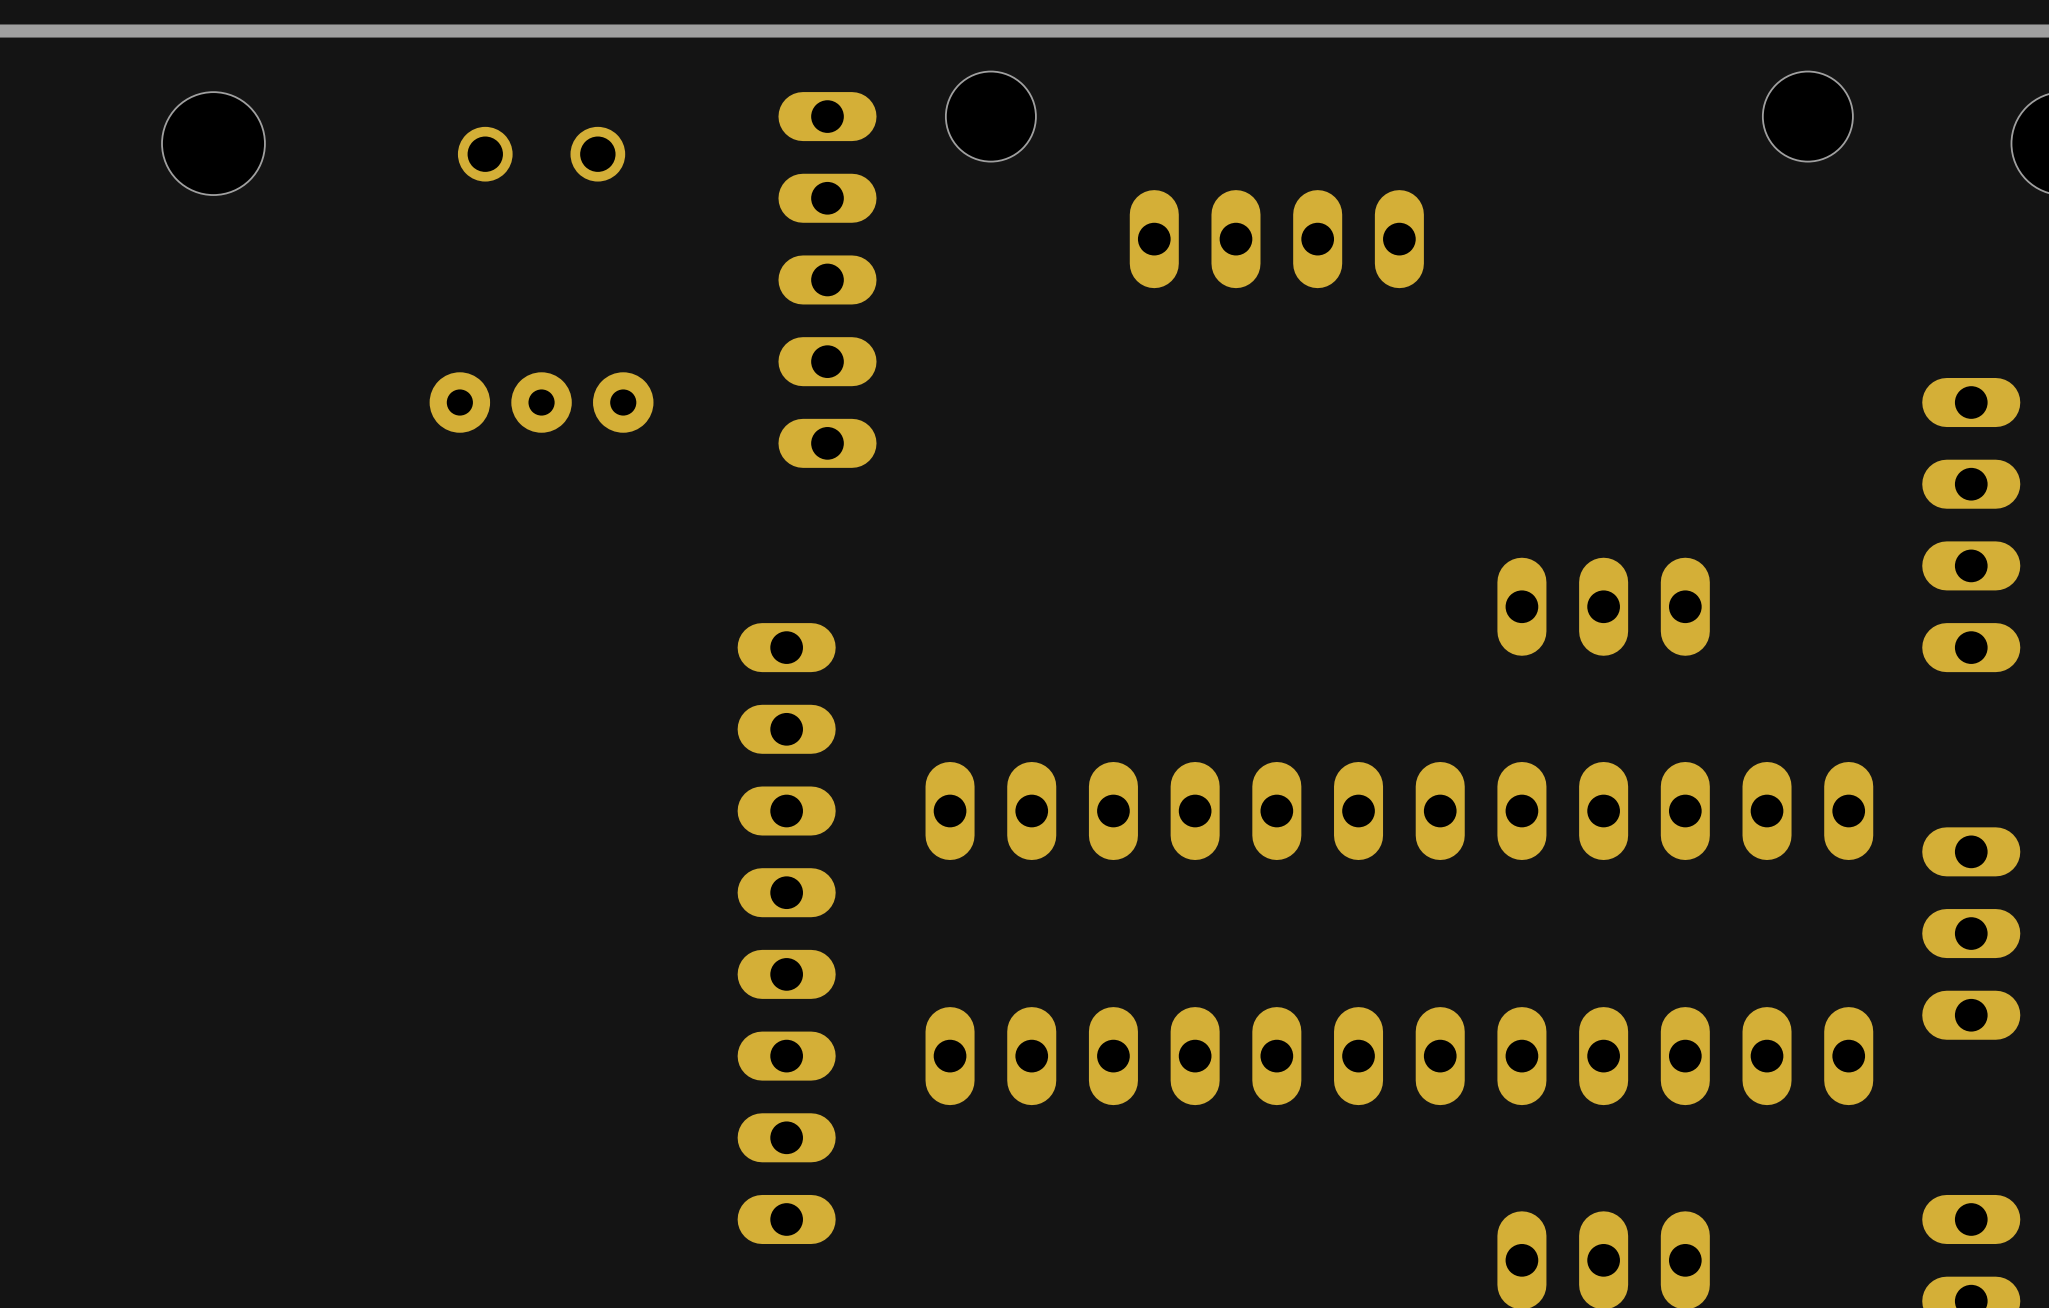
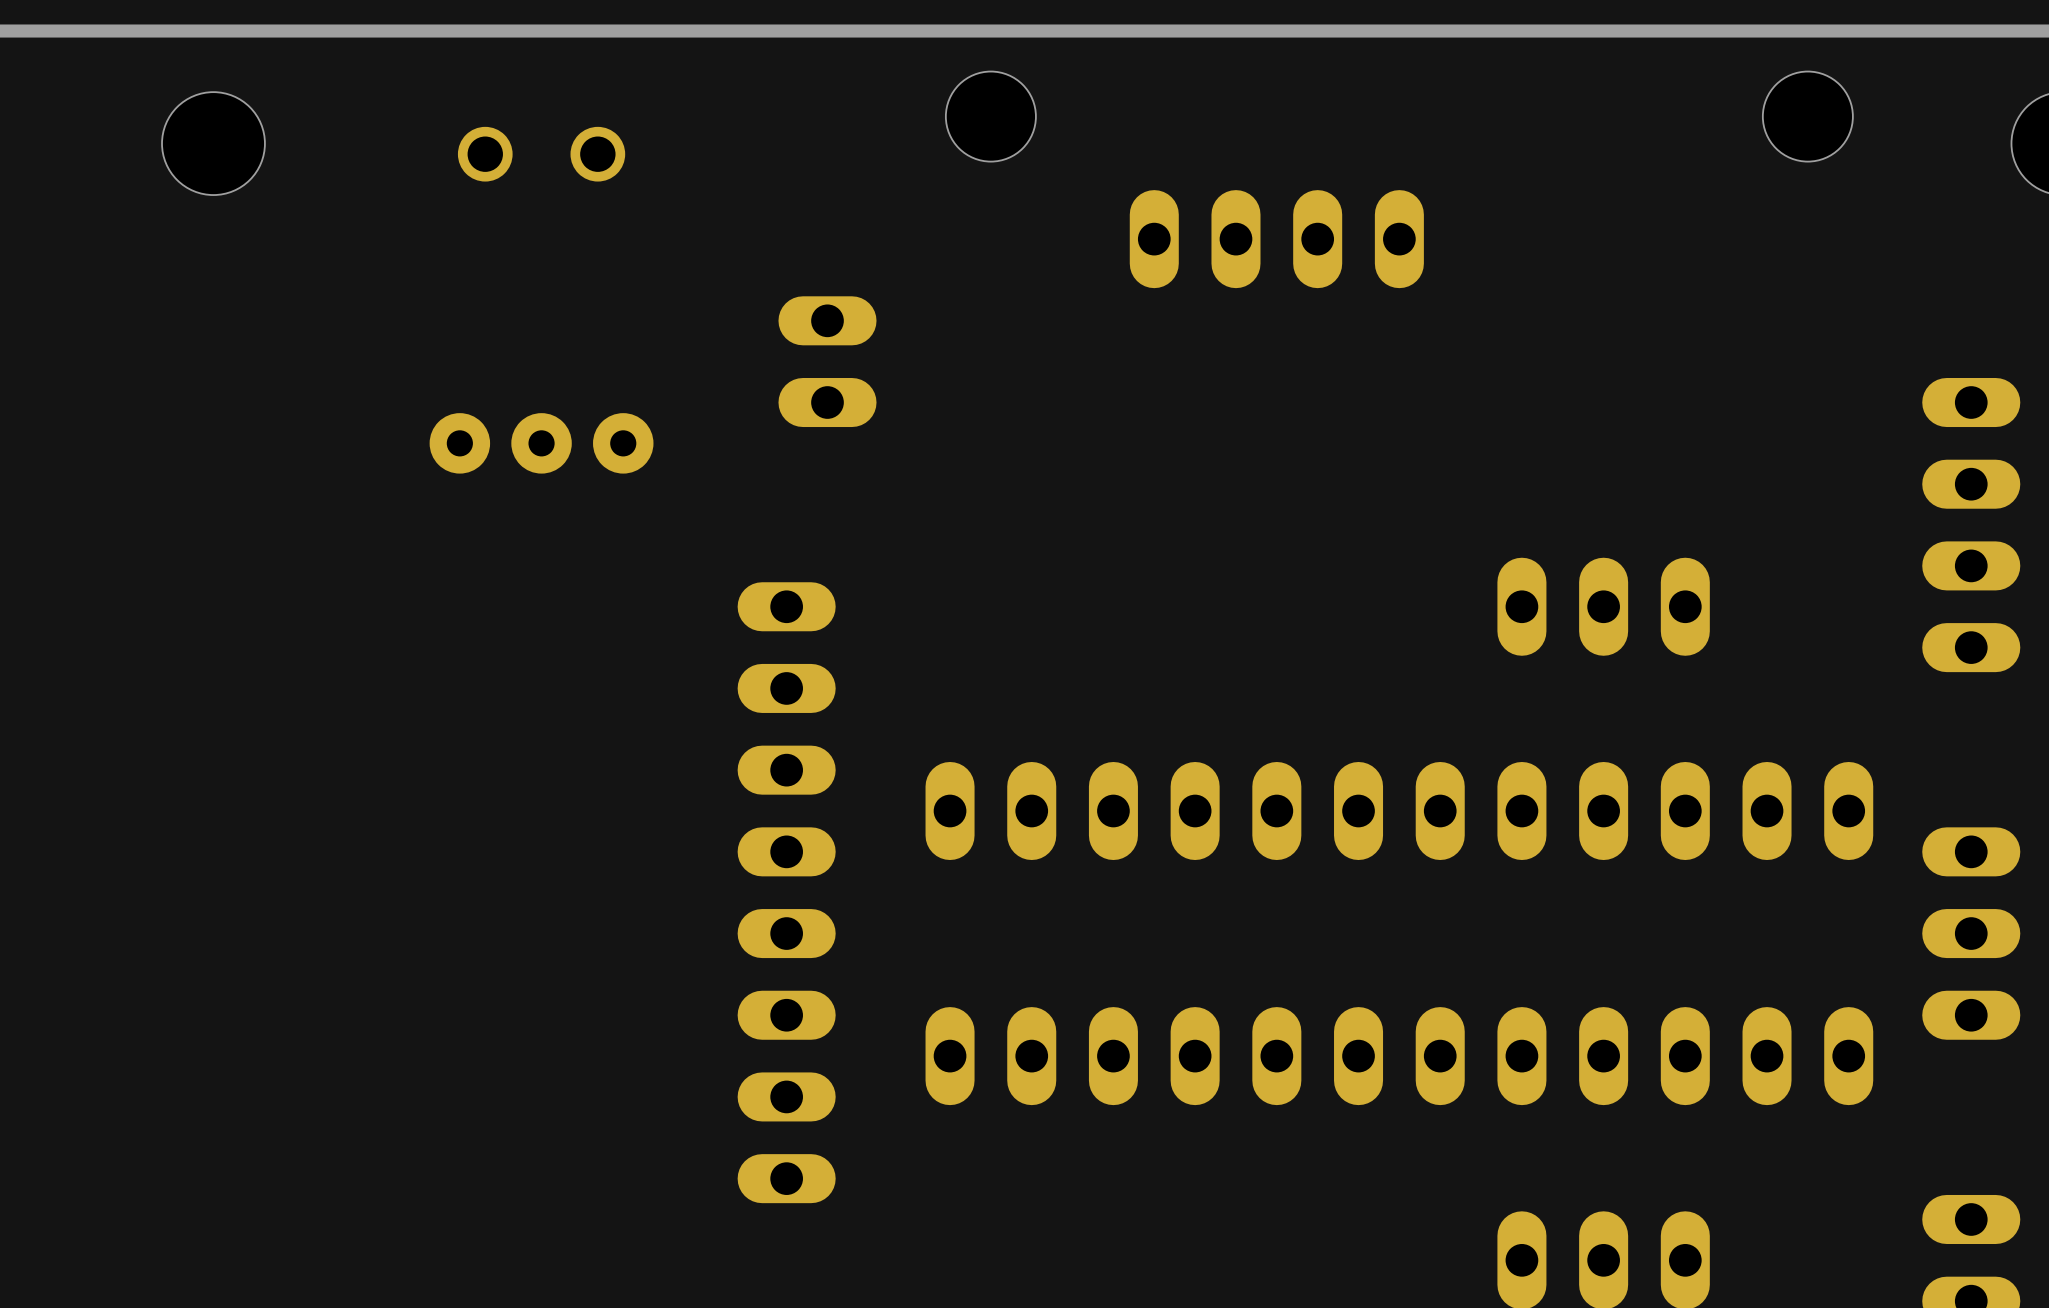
part: (827, 198) -> none
part position: (541, 402) -> (541, 443)
part position: (827, 402) -> (827, 361)
part position: (786, 933) -> (786, 892)

